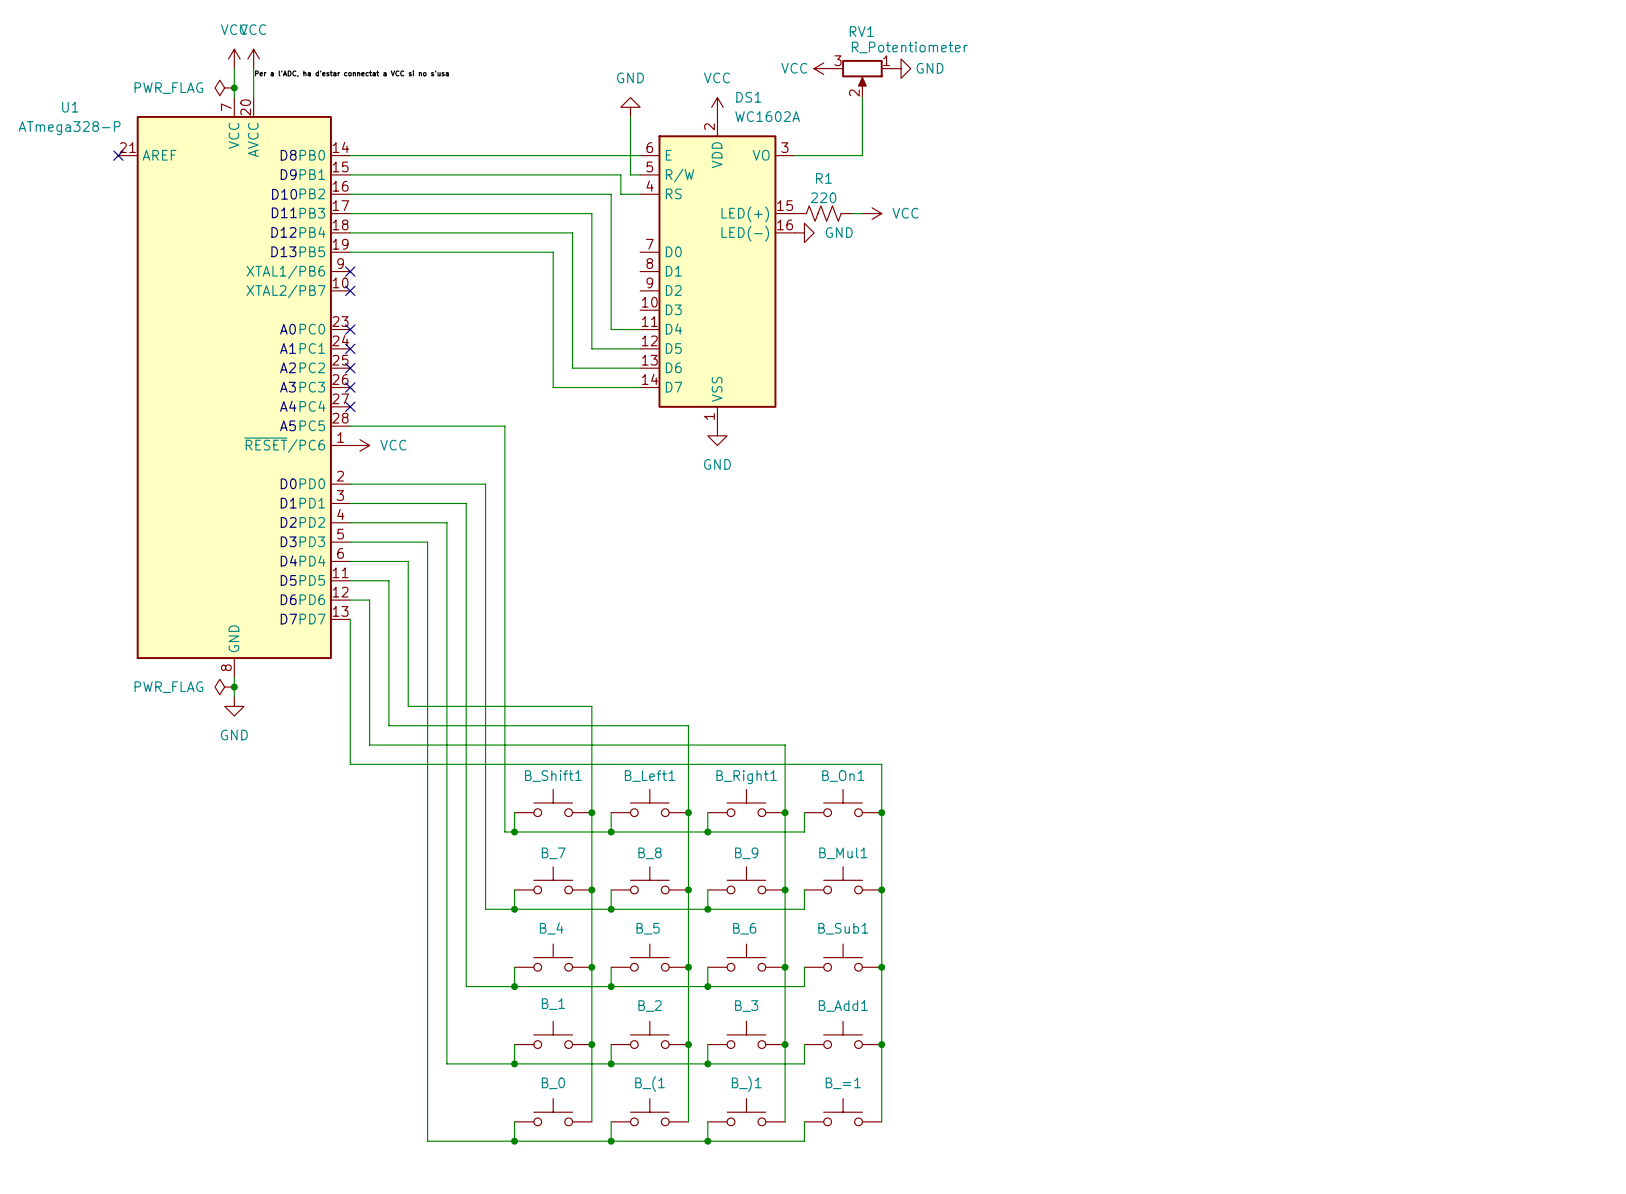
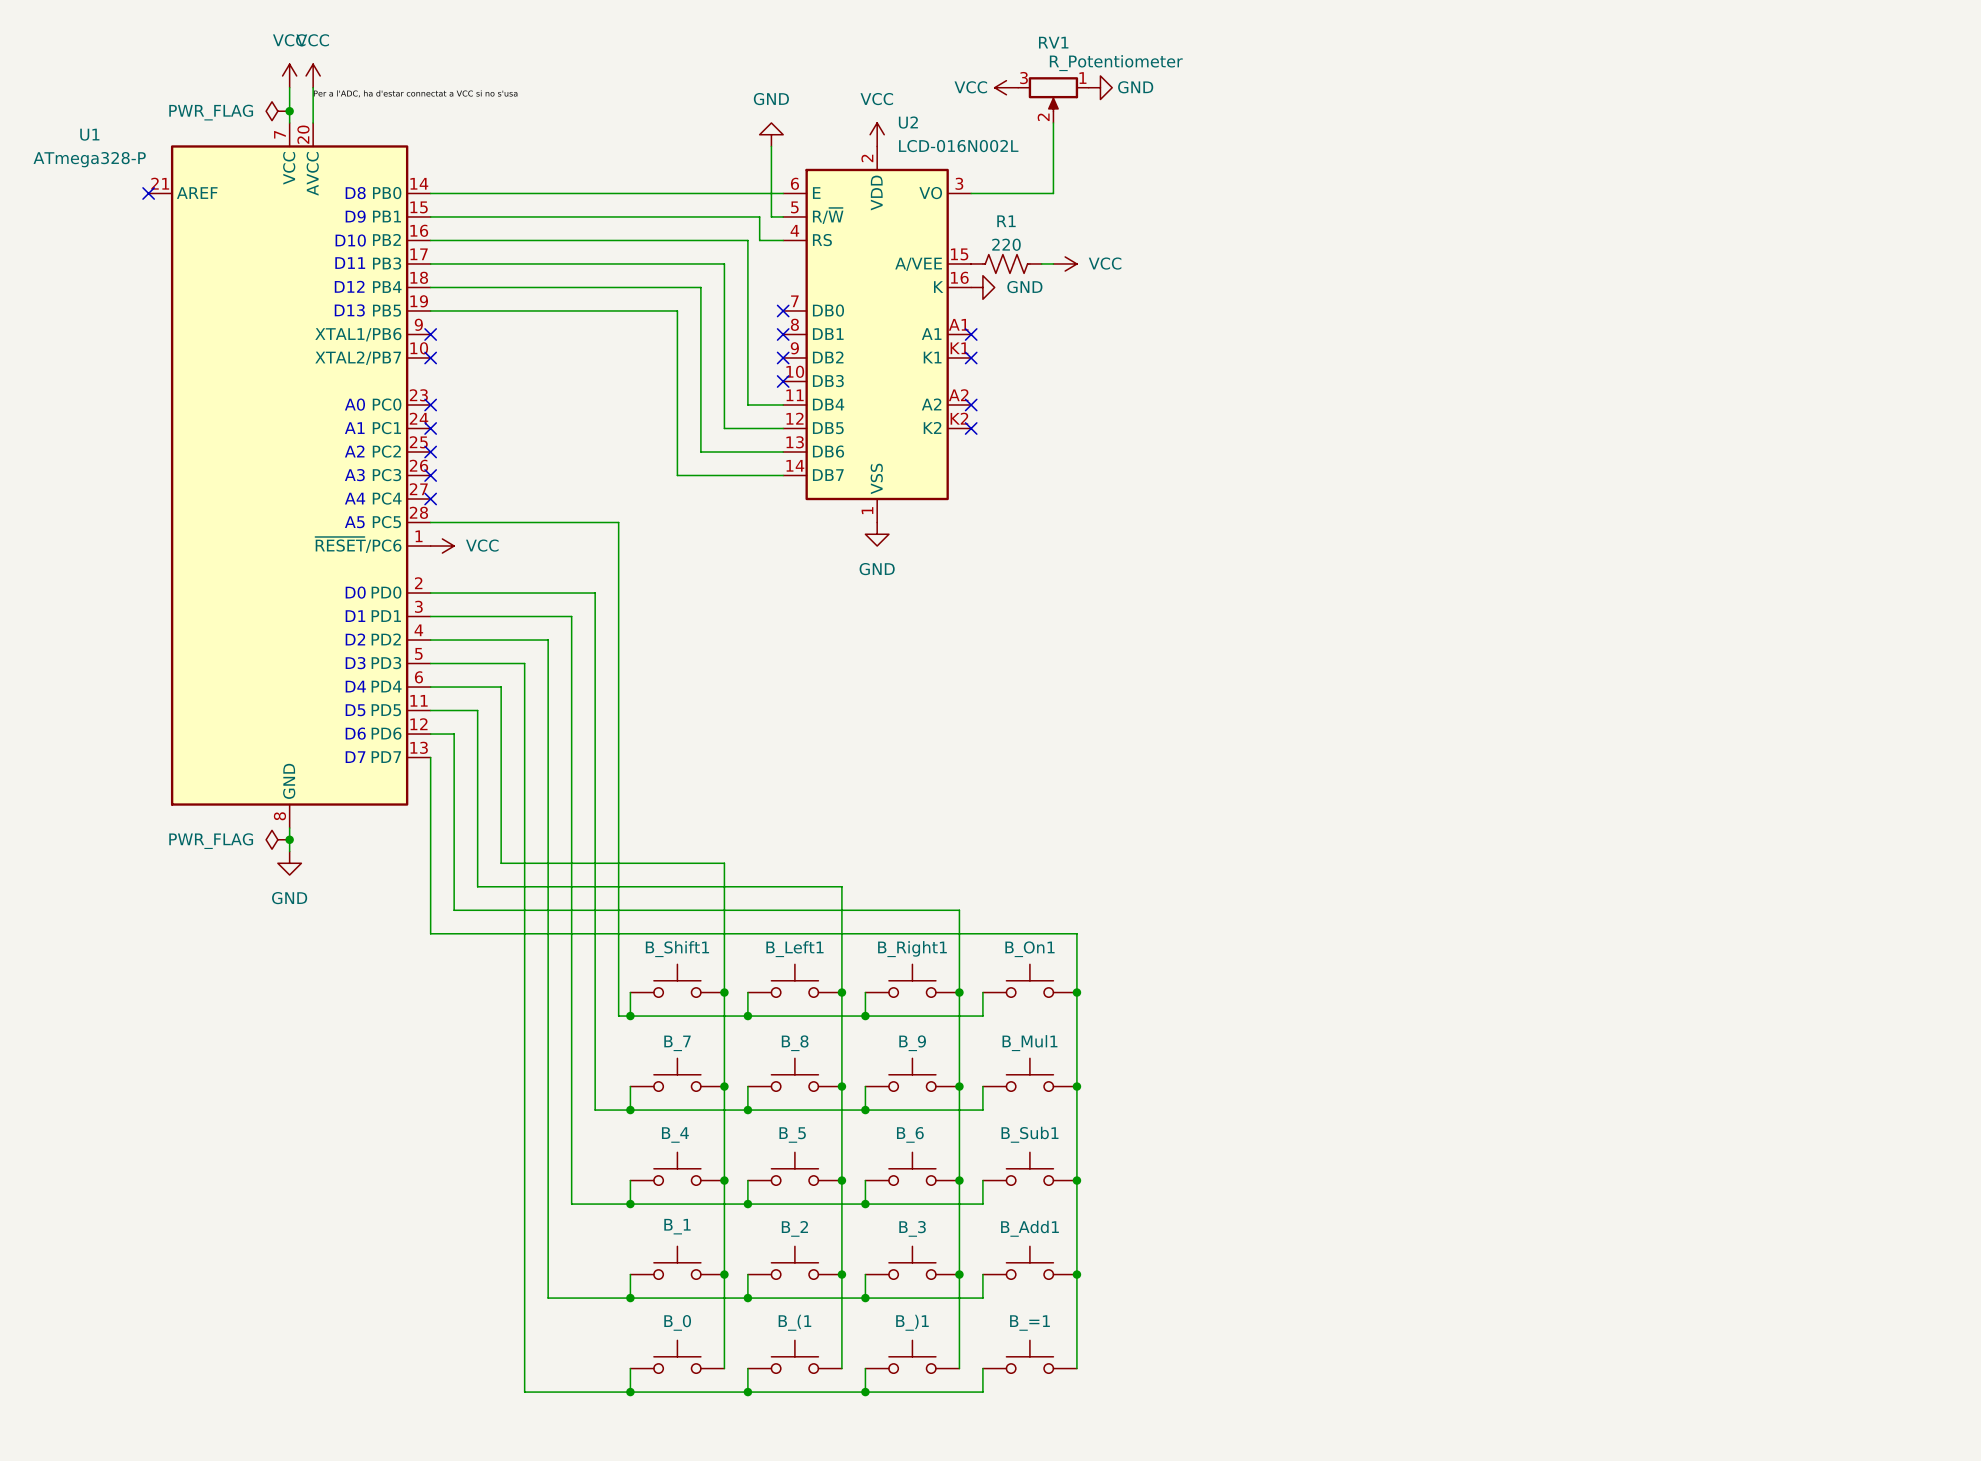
no-connect mark: none -> (783, 310)
no-connect mark: none -> (783, 334)
DS1: WC1602A (717, 271) -> none
U2: none -> LCD-016N002L (877, 334)
no-connect mark: none -> (971, 334)
no-connect mark: none -> (783, 357)
no-connect mark: none -> (971, 357)
no-connect mark: none -> (783, 381)
no-connect mark: none -> (971, 404)
no-connect mark: none -> (971, 428)

